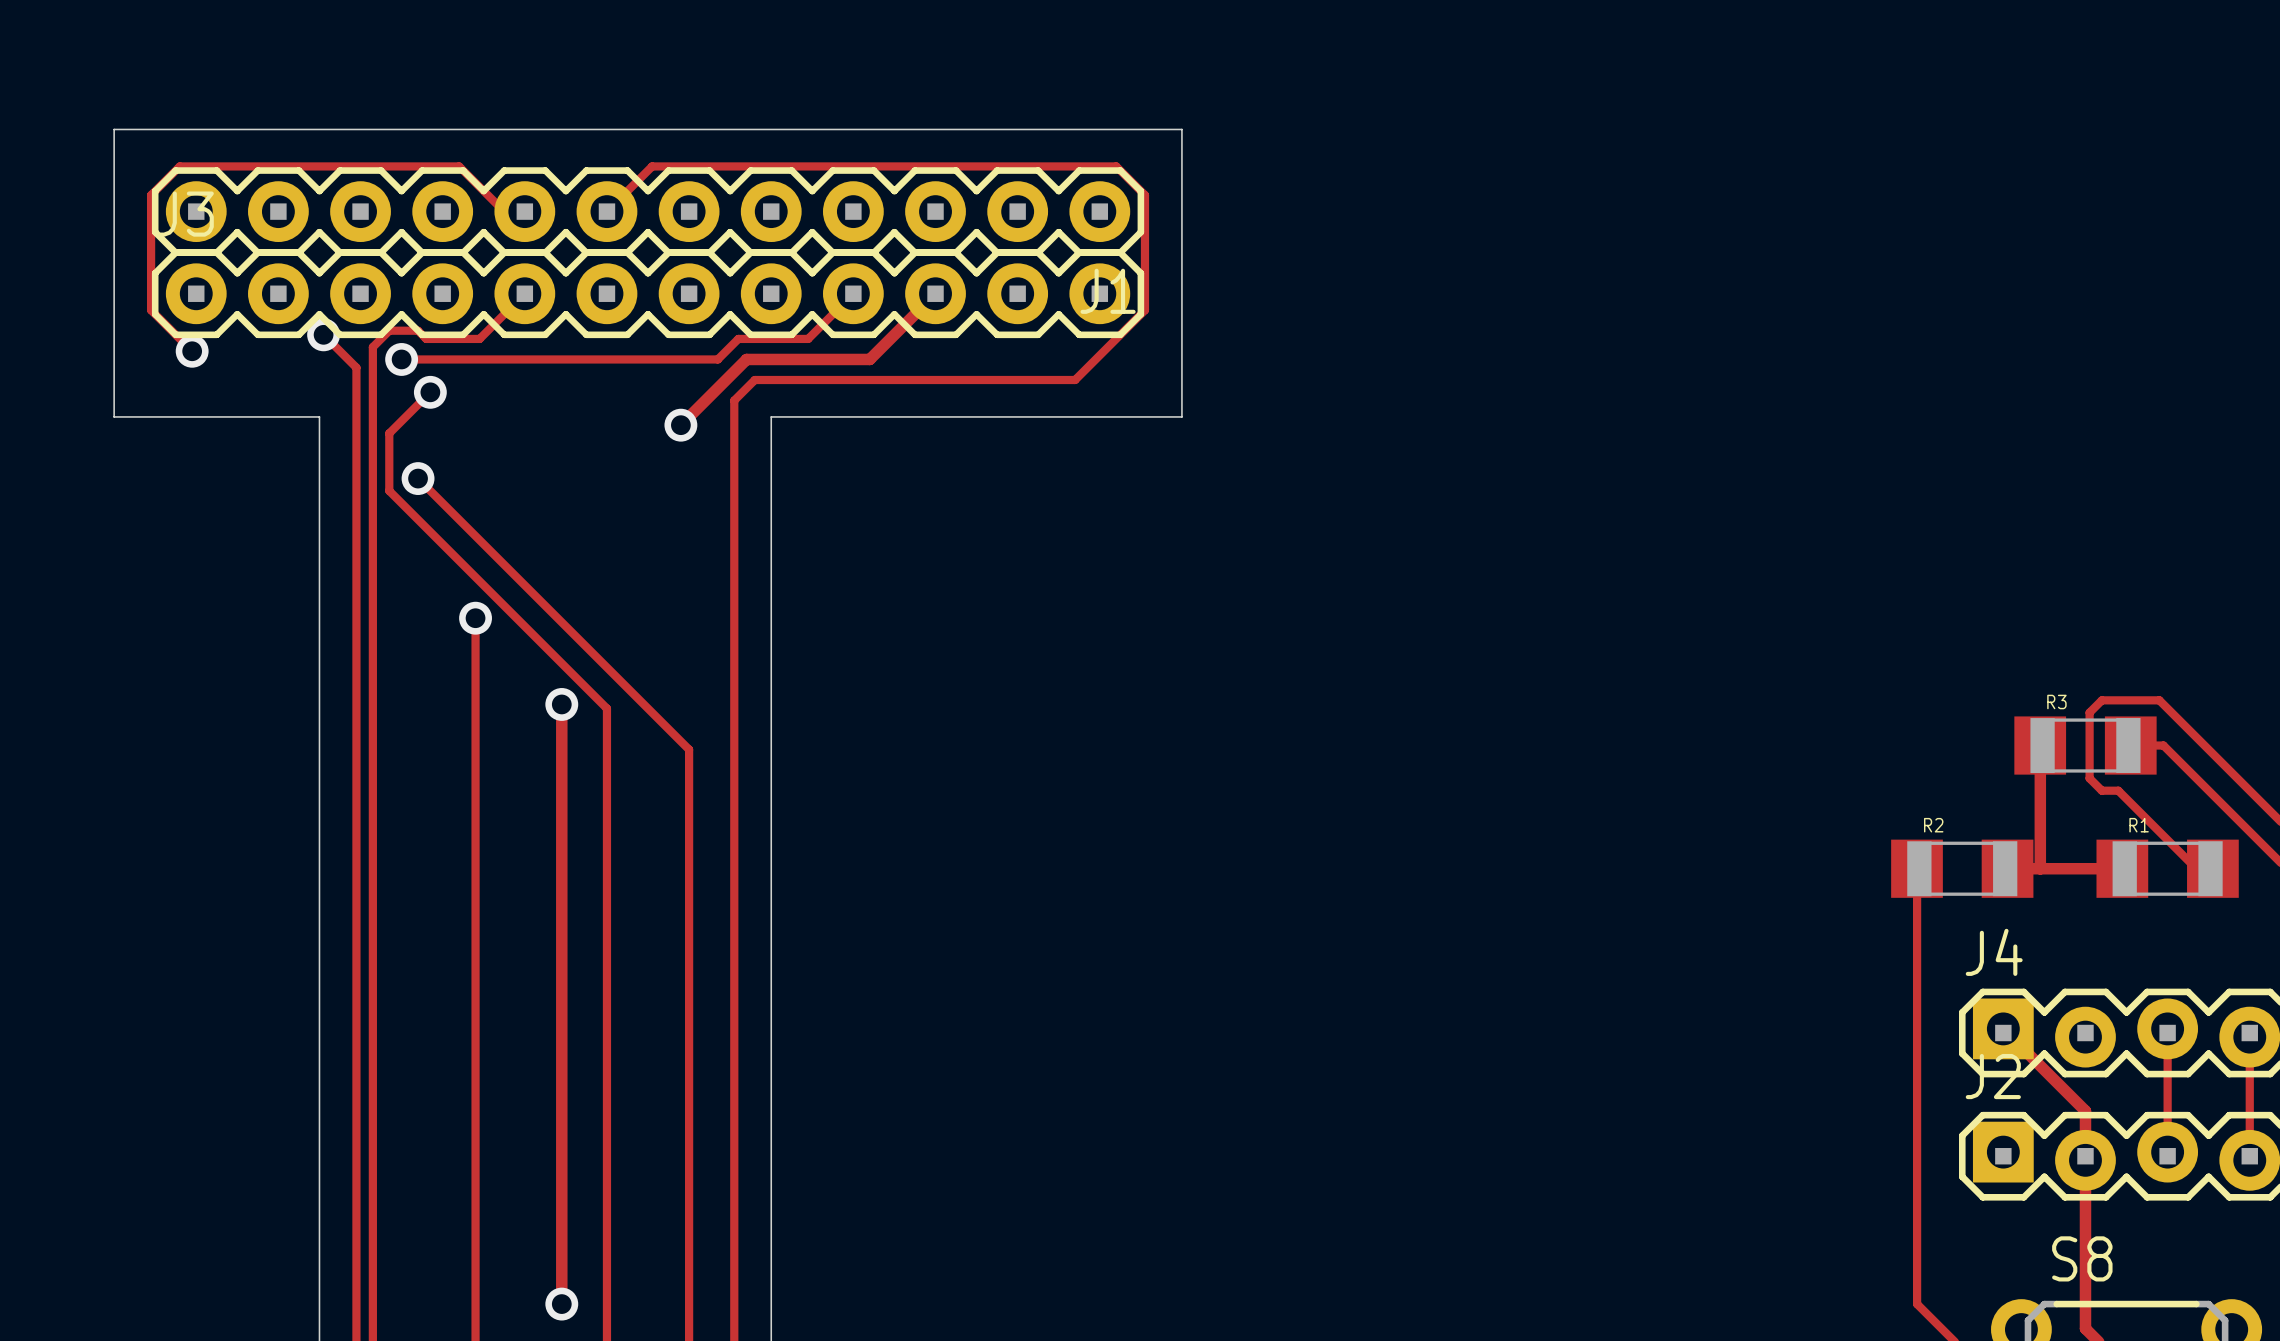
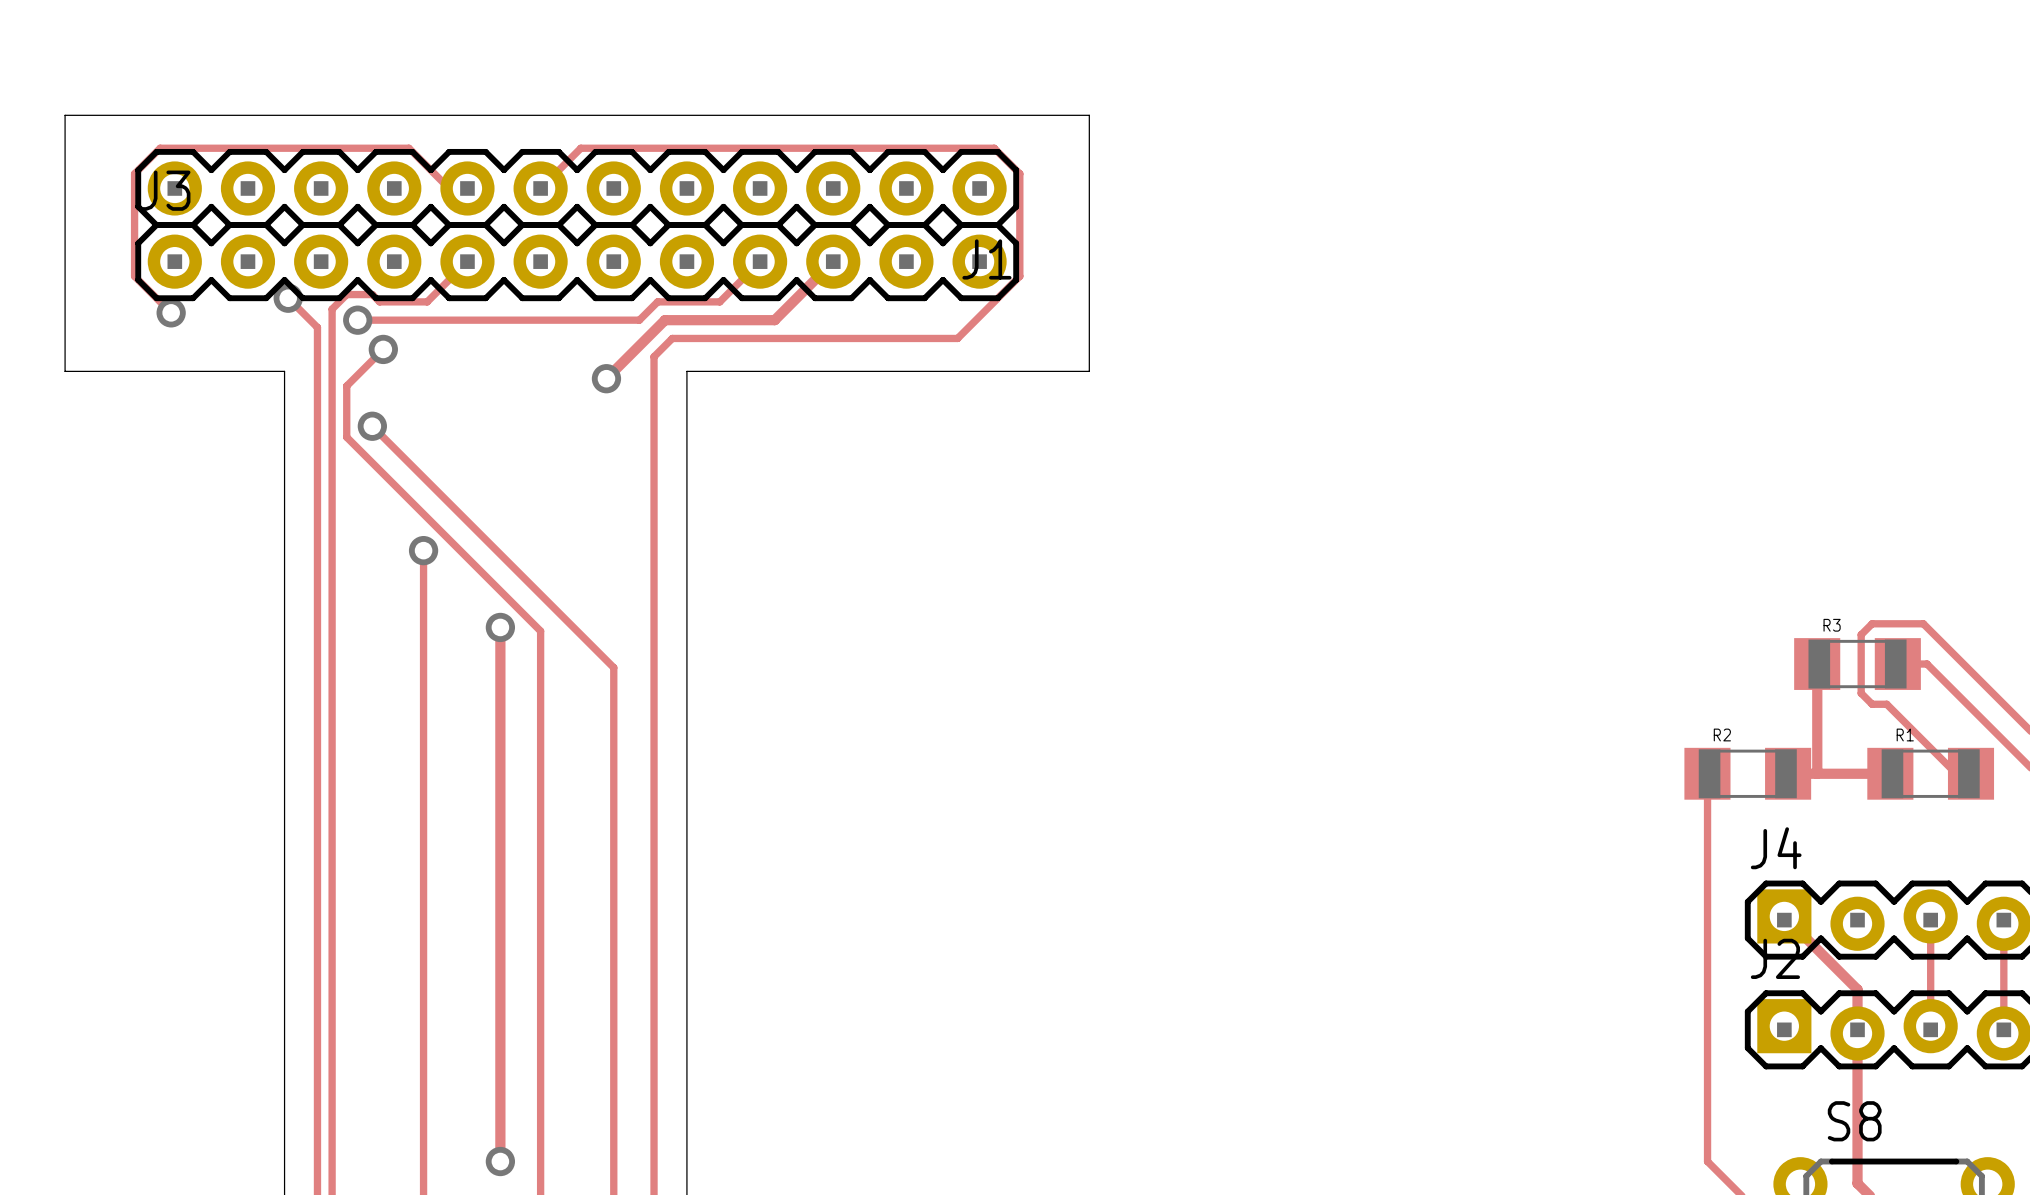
board edge: (114, 129) (114, 416) -> (101, 115) (65, 115) (65, 371) (101, 371)
board edge: (1181, 129) (1181, 416) -> (1052, 115) (1089, 115) (1089, 371) (1052, 371)

